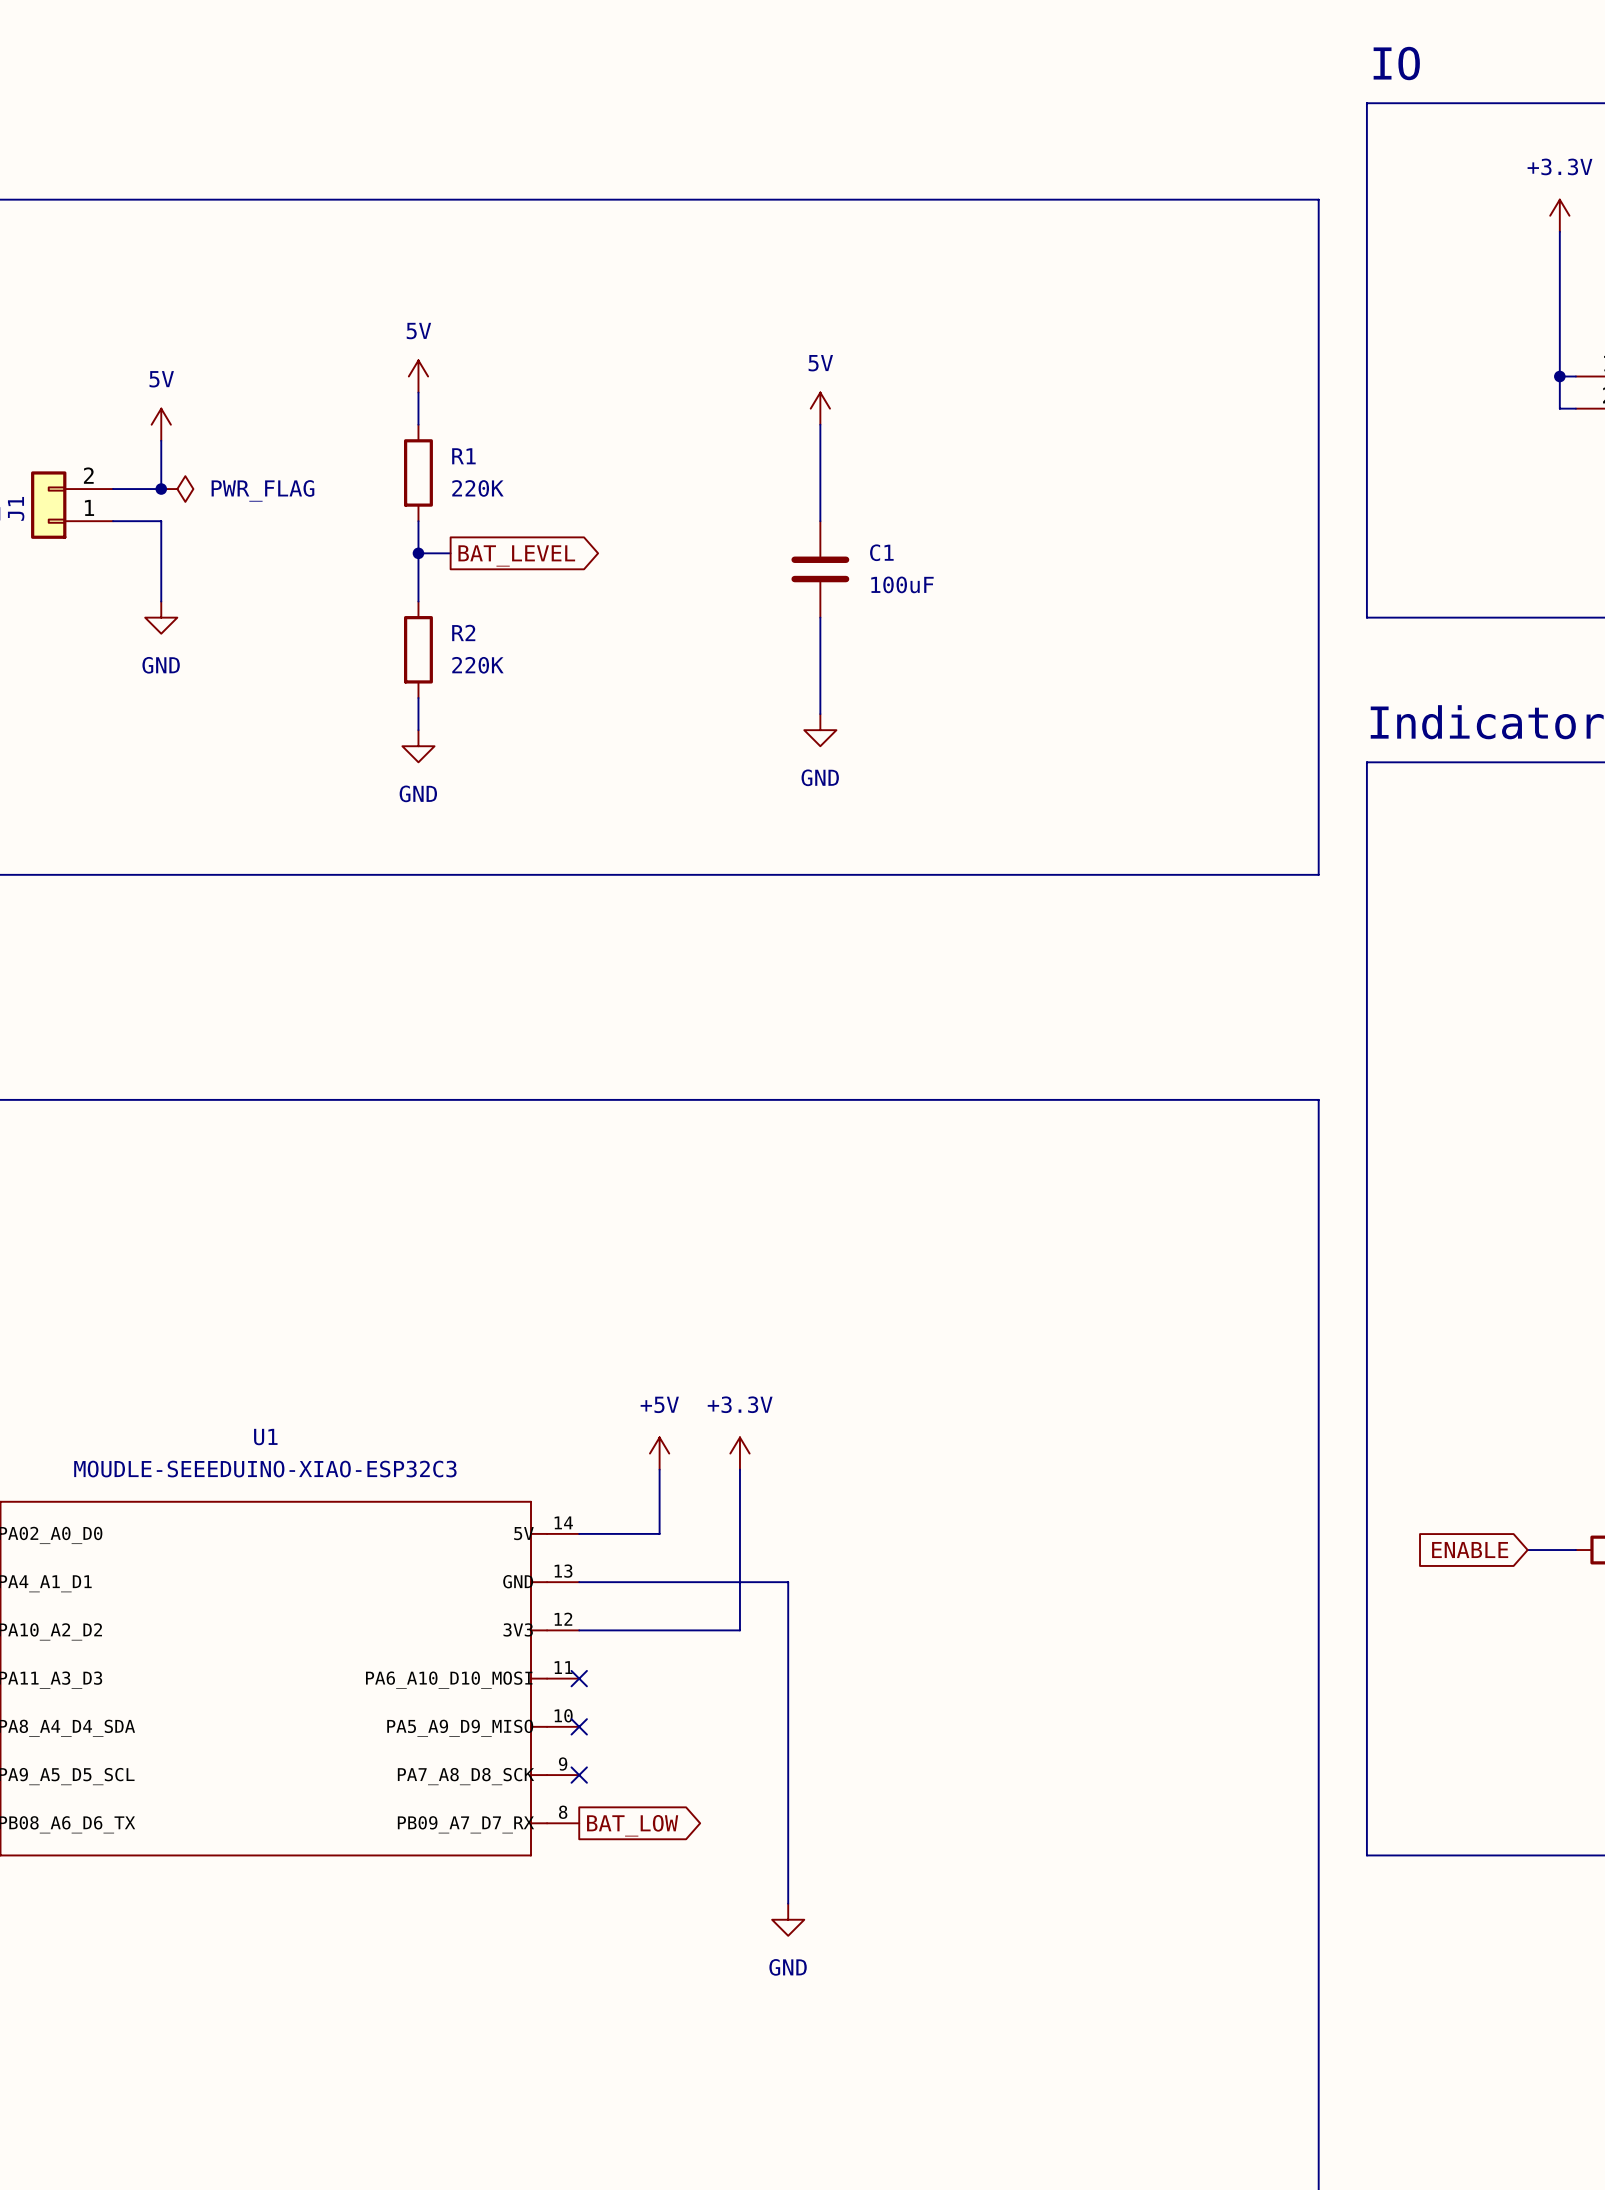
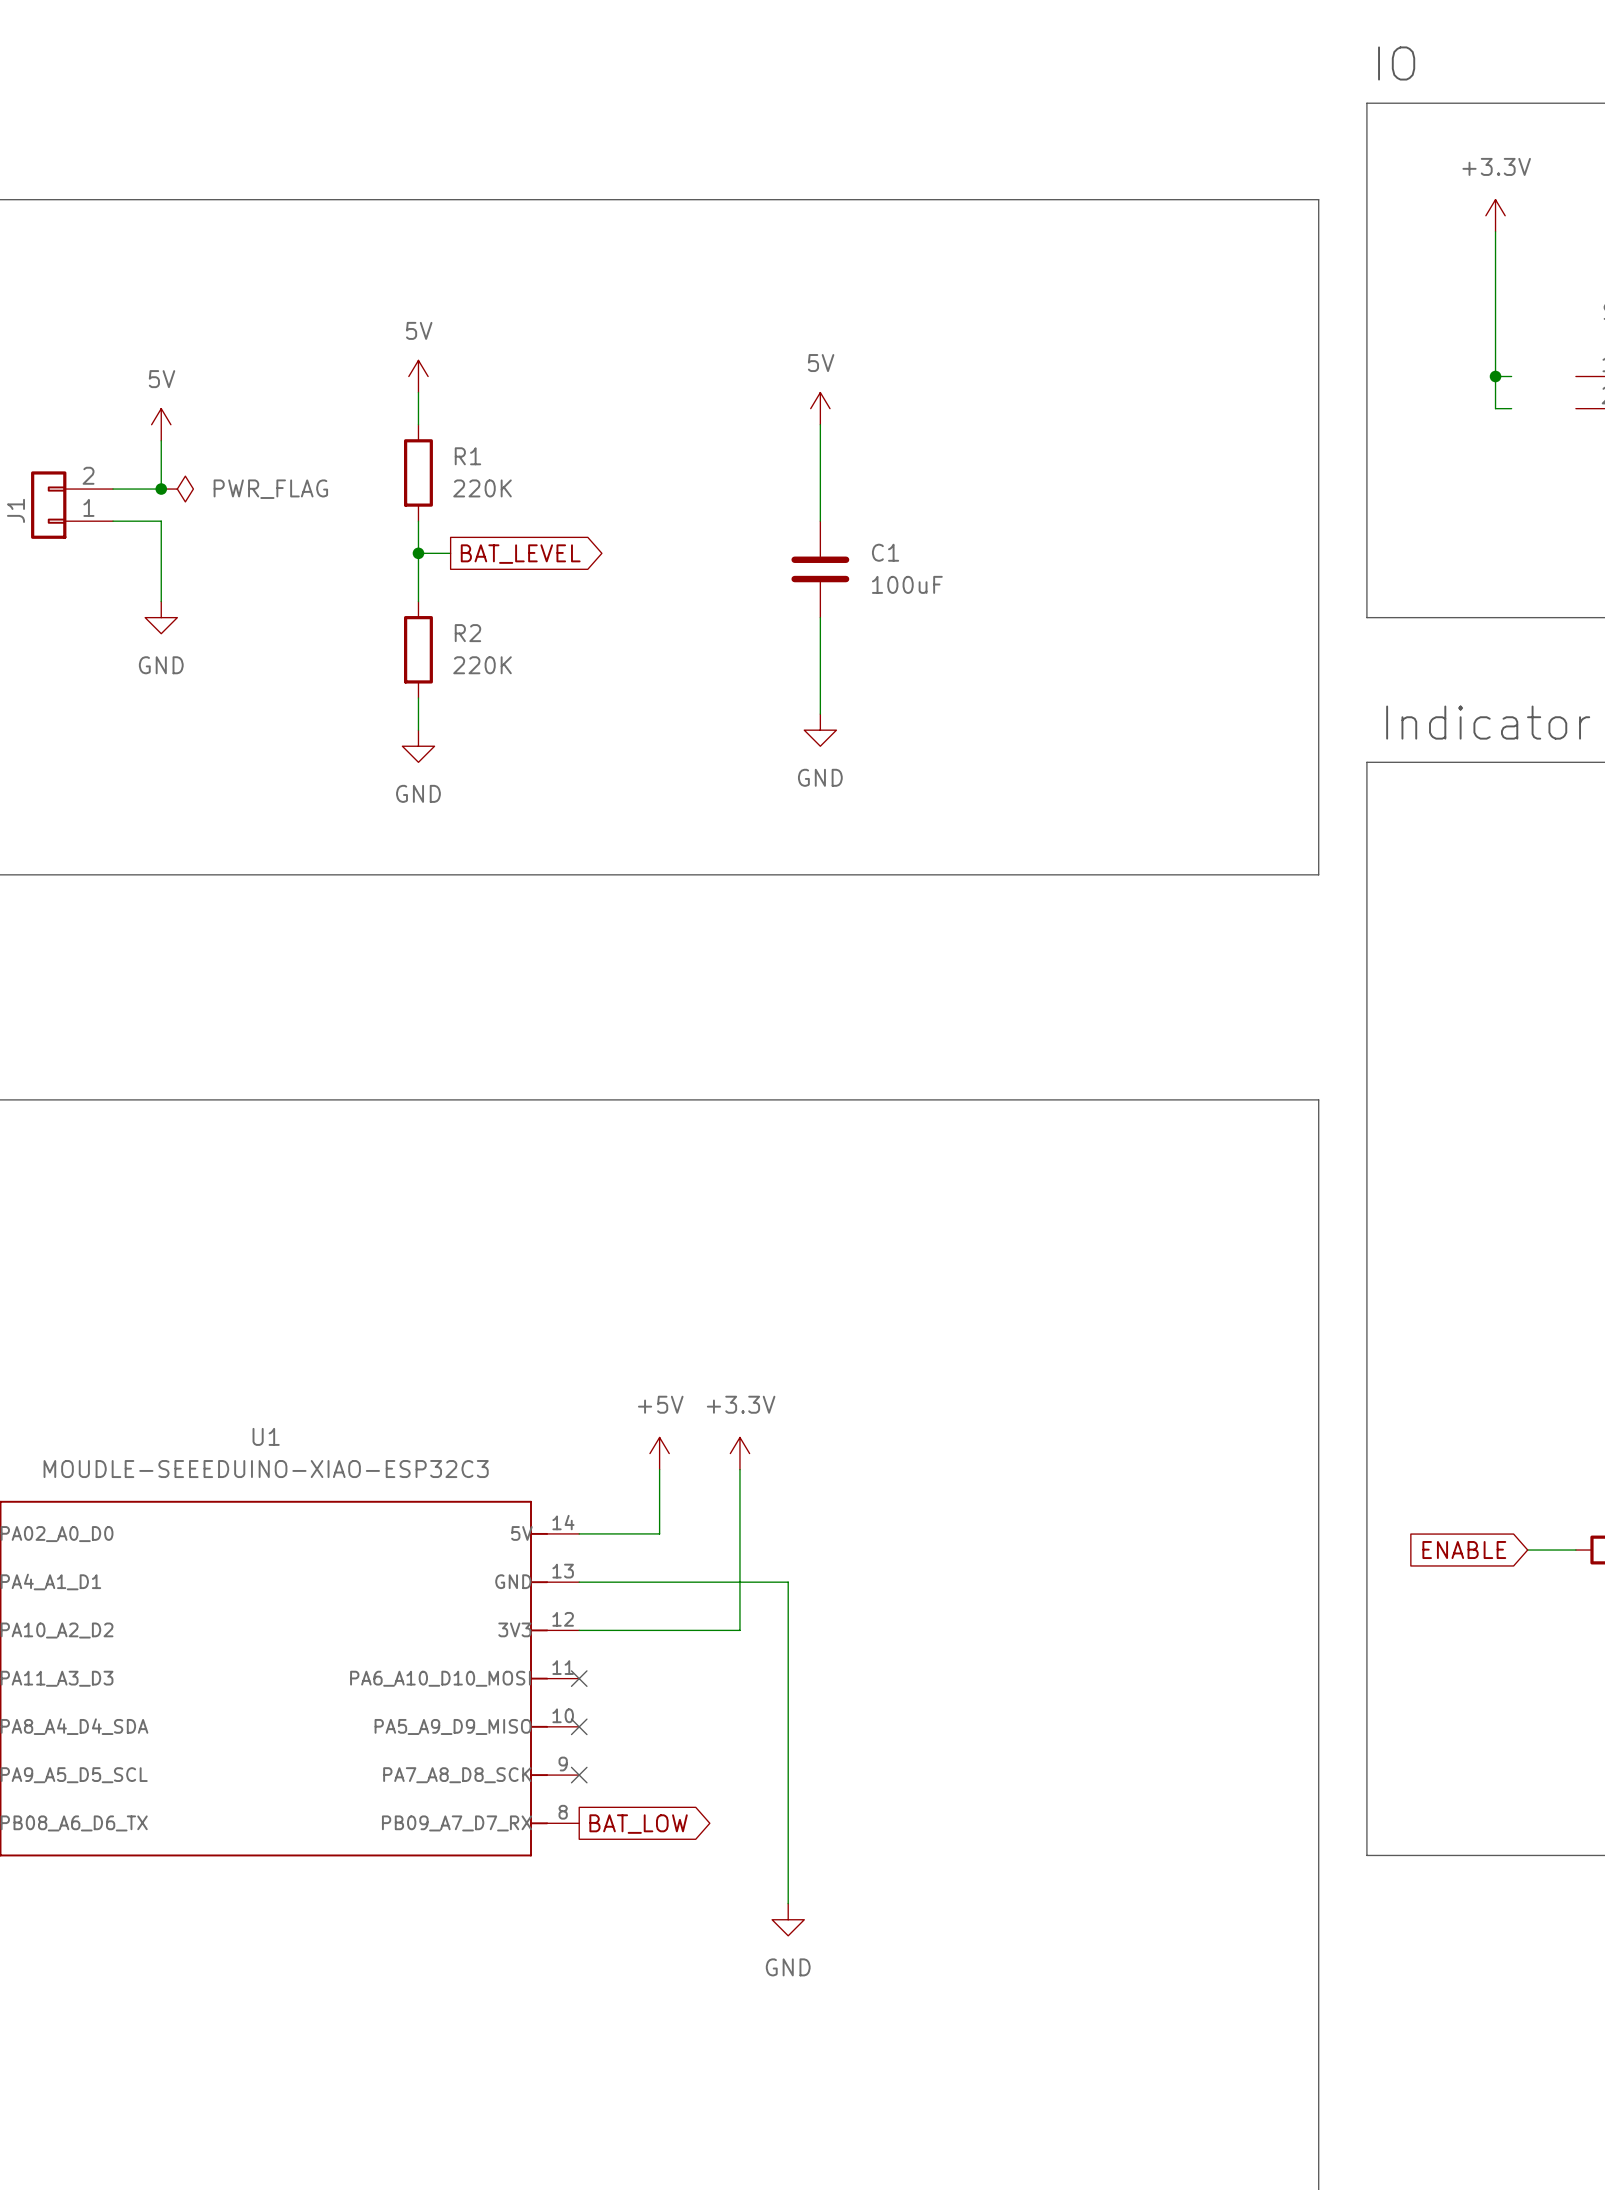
power symbol position: +3.3V (1559, 215) -> +3.3V (1495, 215)
wire: (1559, 231) (1559, 408) (1575, 408) -> (1495, 231) (1495, 408) (1511, 408)
wire: (1559, 376) (1575, 376) -> (1495, 376) (1511, 376)
junction position: (1559, 376) -> (1495, 376)

